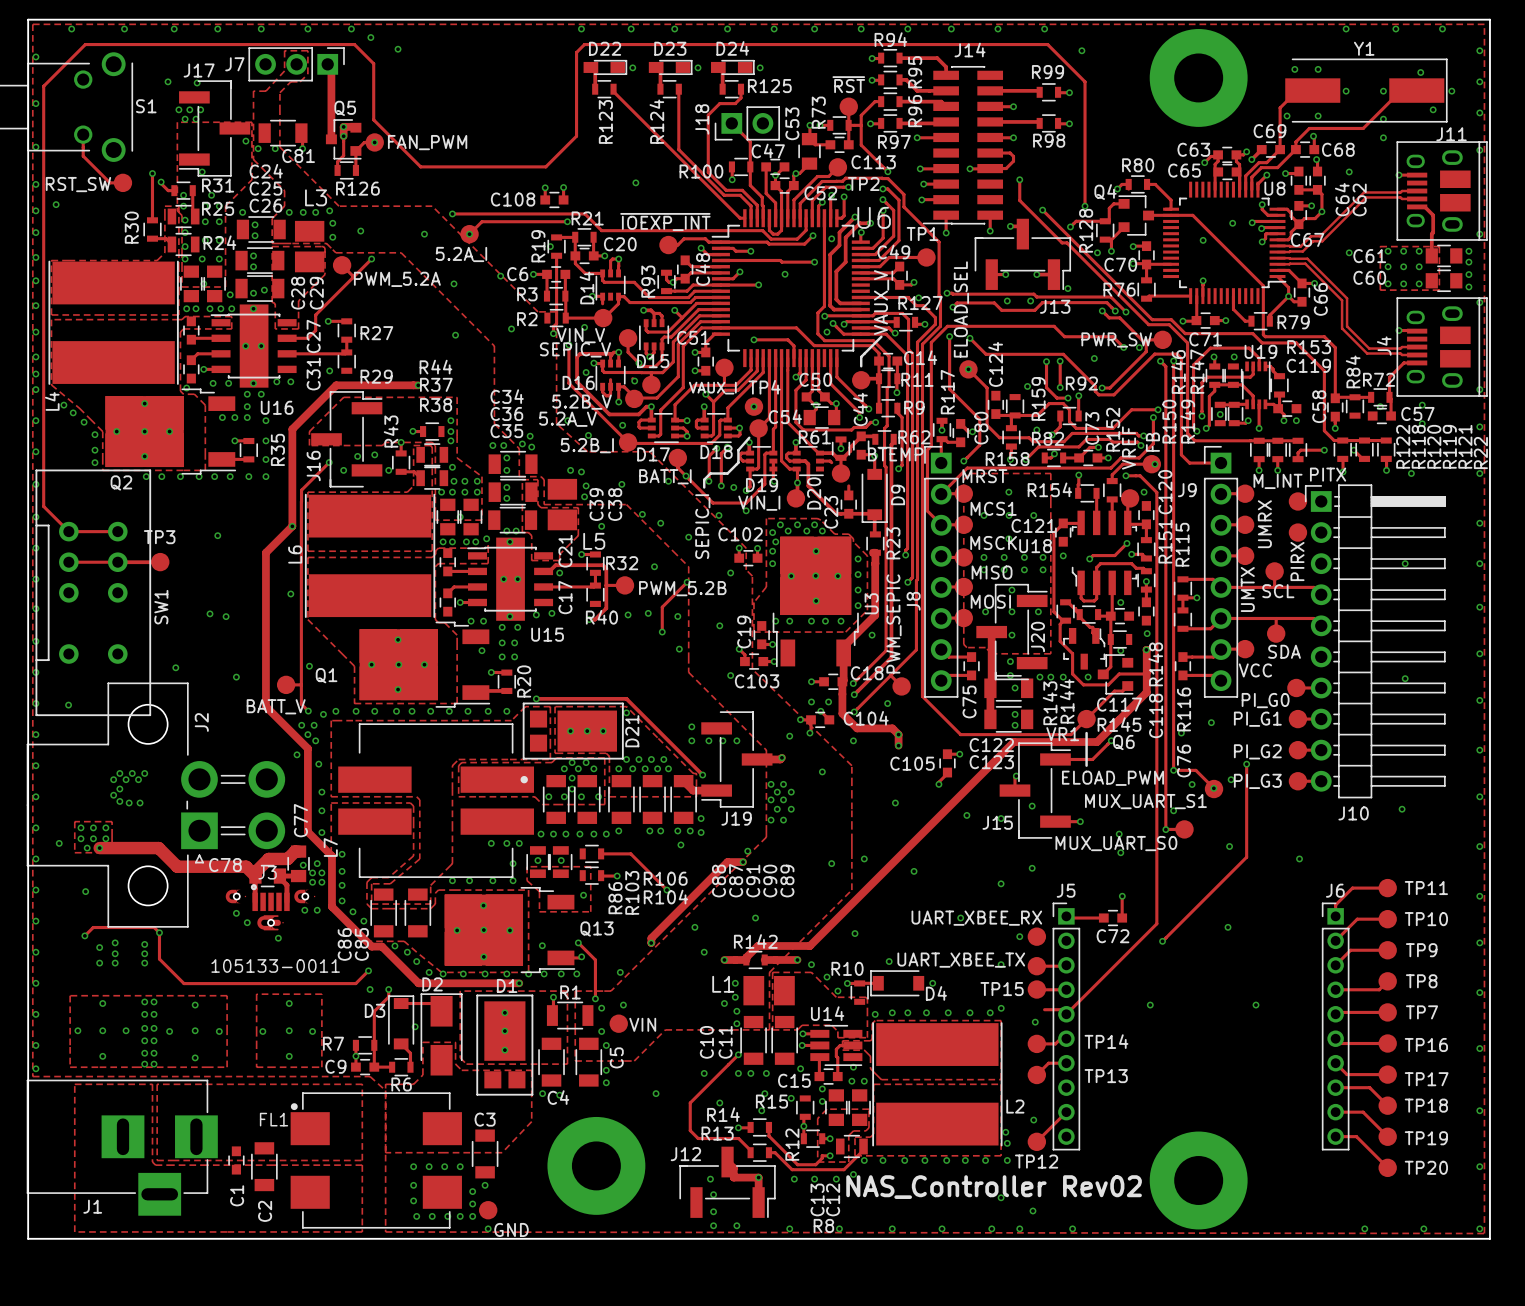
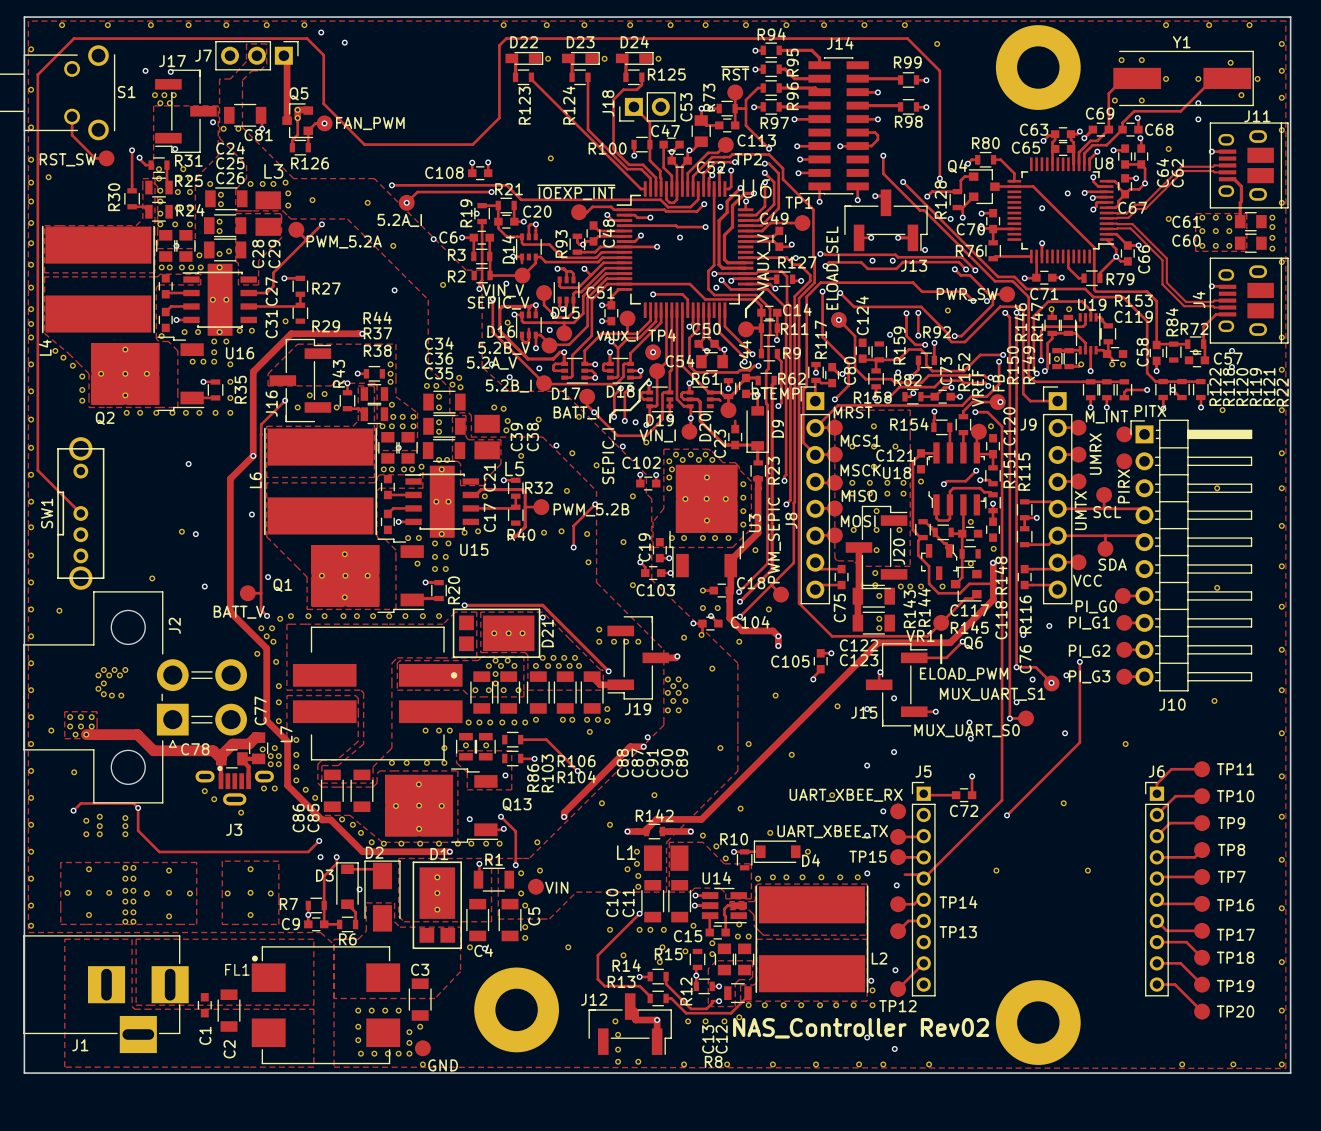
SW1 footprint: [35, 469, 152, 717] -> [57, 437, 105, 590]
track: (43, 506) (68, 531) (117, 531) -> (37, 438) (37, 470) (80, 513)
track: (68, 562) (160, 562) -> none
TP3: (160, 562) -> none
SW1 name position: SW1 (161, 607) -> SW1 (47, 513)
J3 name position: J3 (267, 872) -> J3 (234, 829)
J3 footprint: [225, 884, 316, 930] -> [195, 765, 275, 806]
J3 value: 105133-0011 (275, 965) -> none

